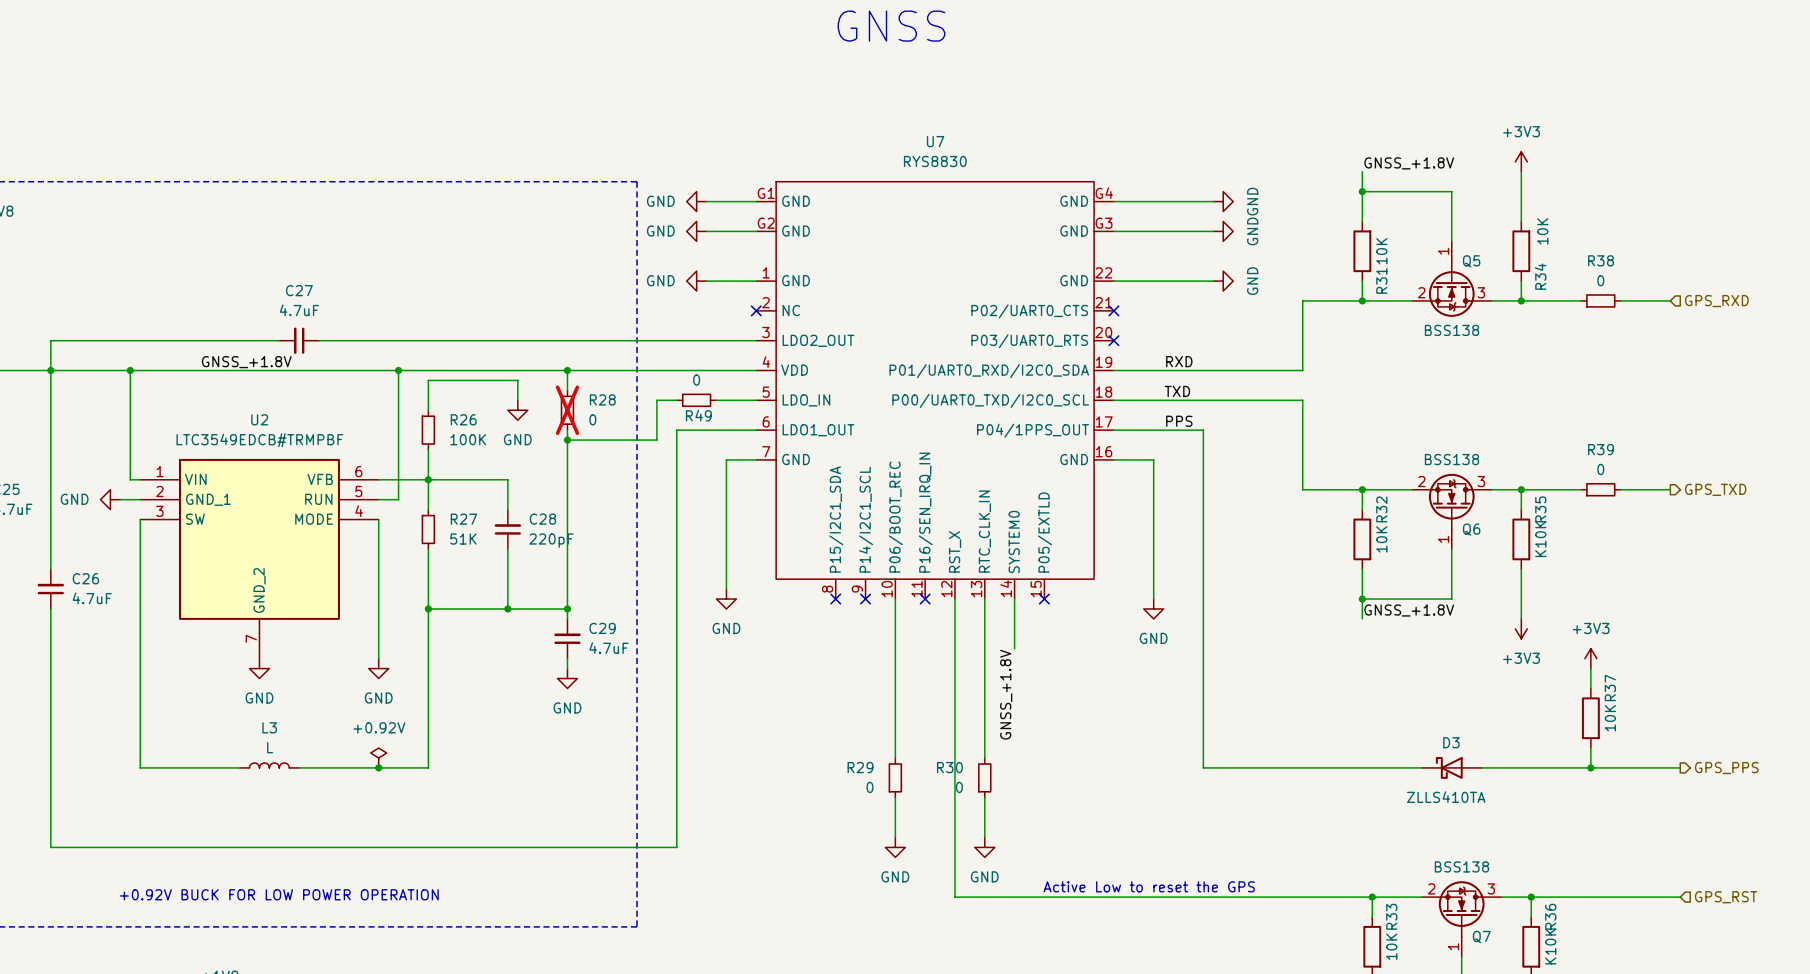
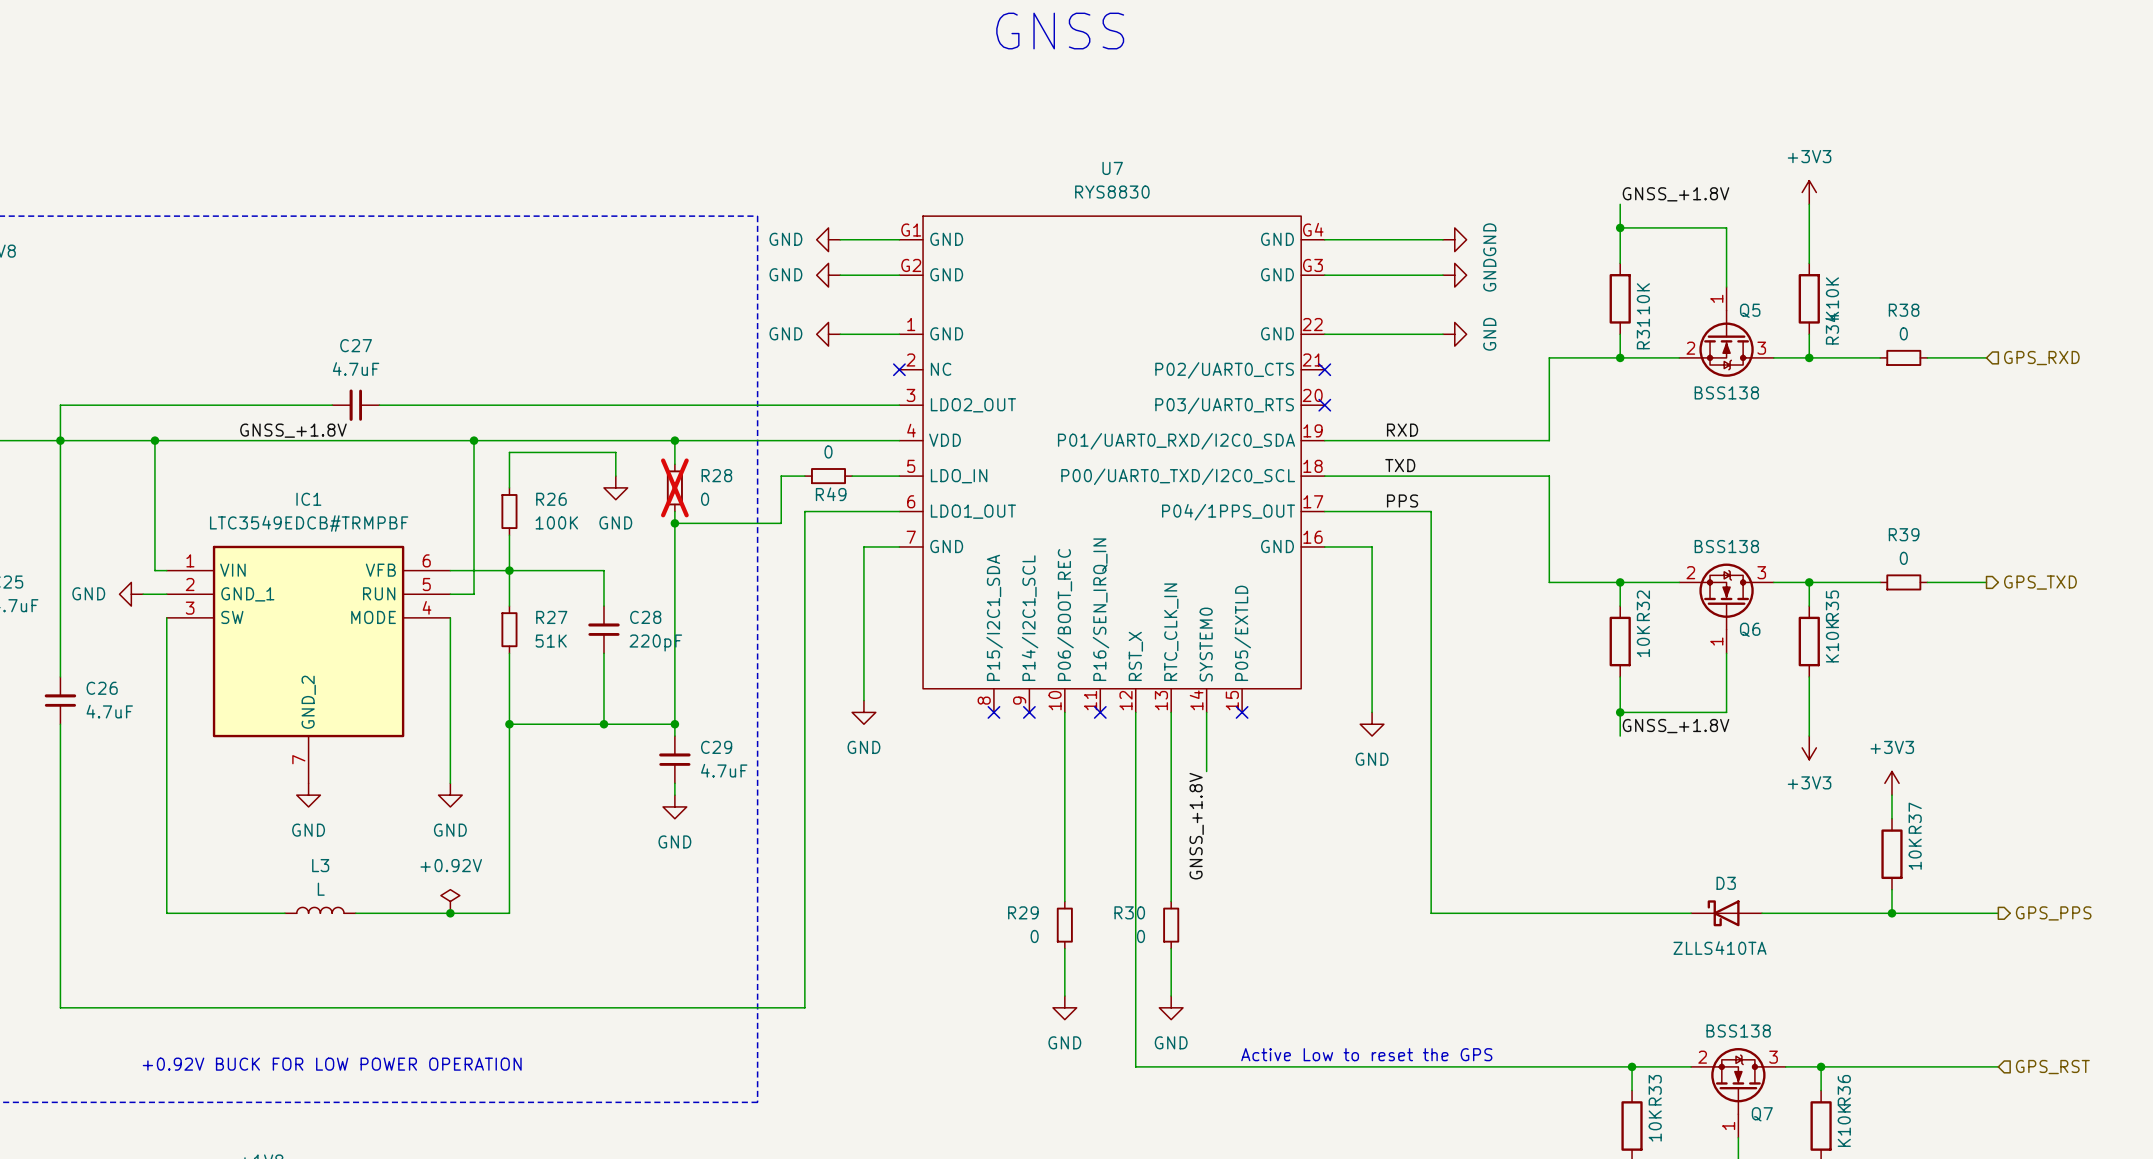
R34 value: 10K (1542, 231) -> K10K (1832, 298)
U2 name: U2 (259, 419) -> IC1 (308, 499)

